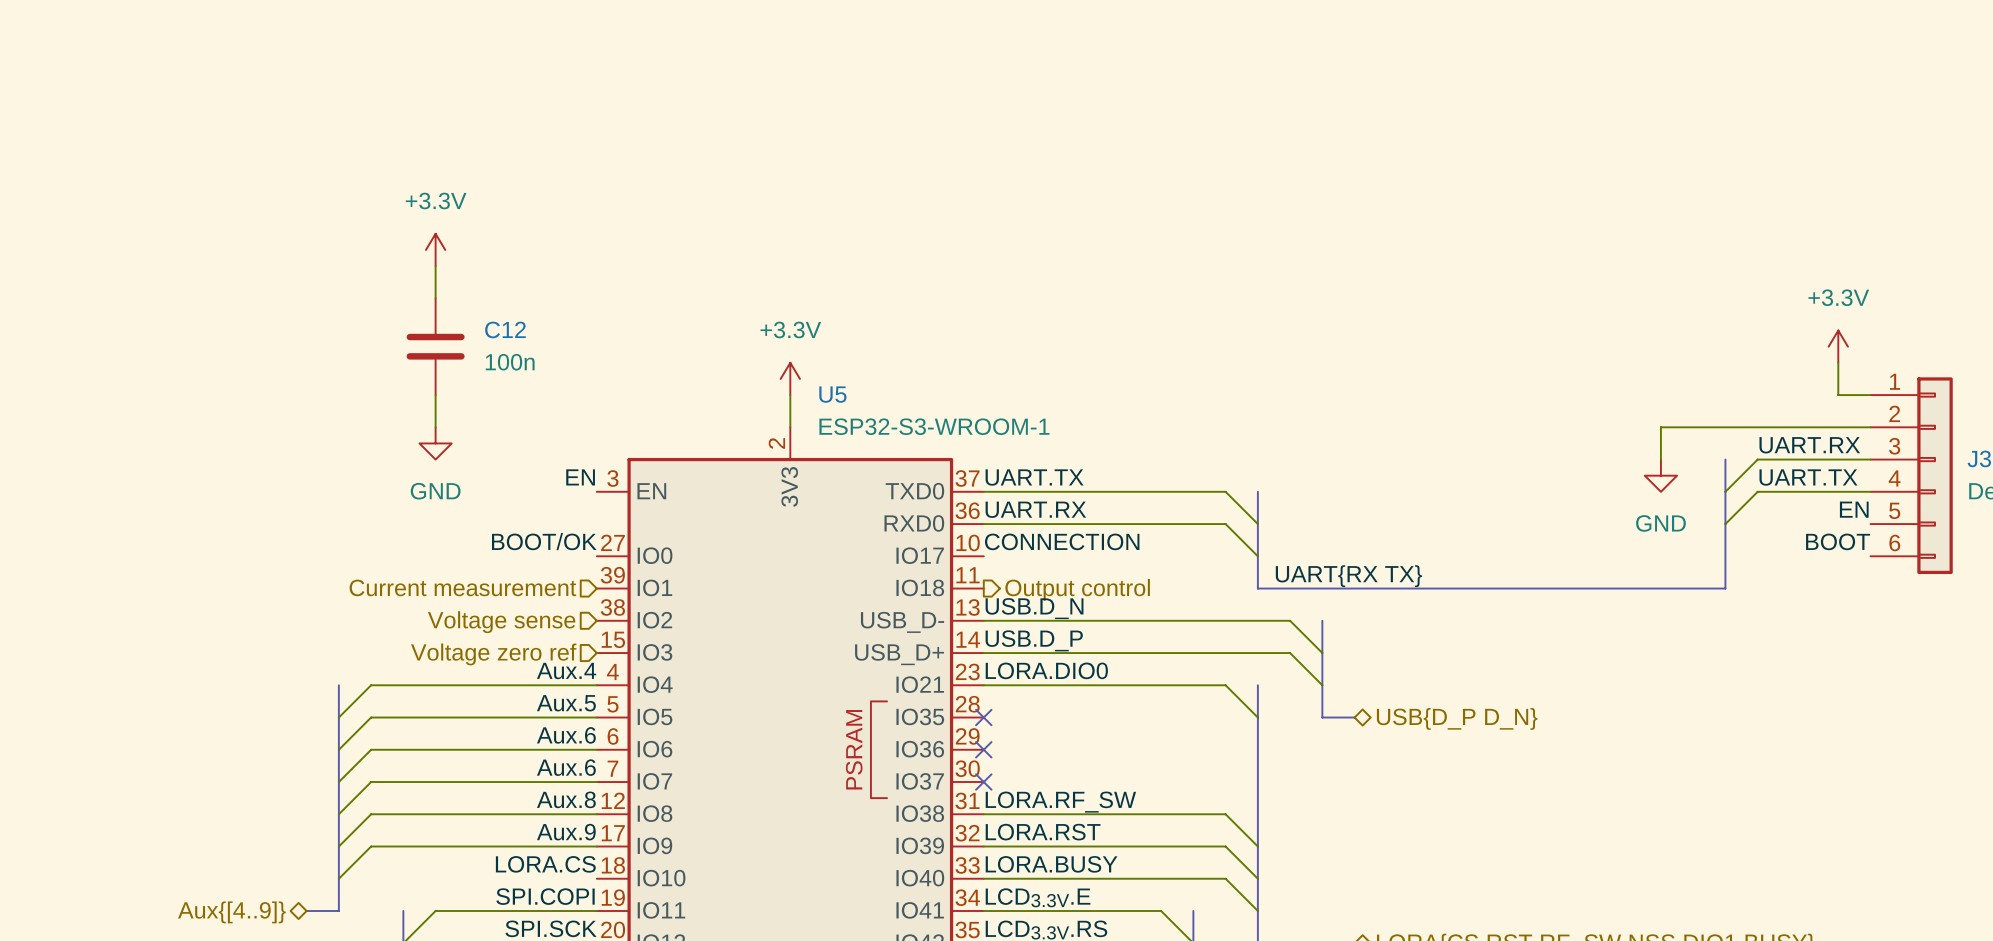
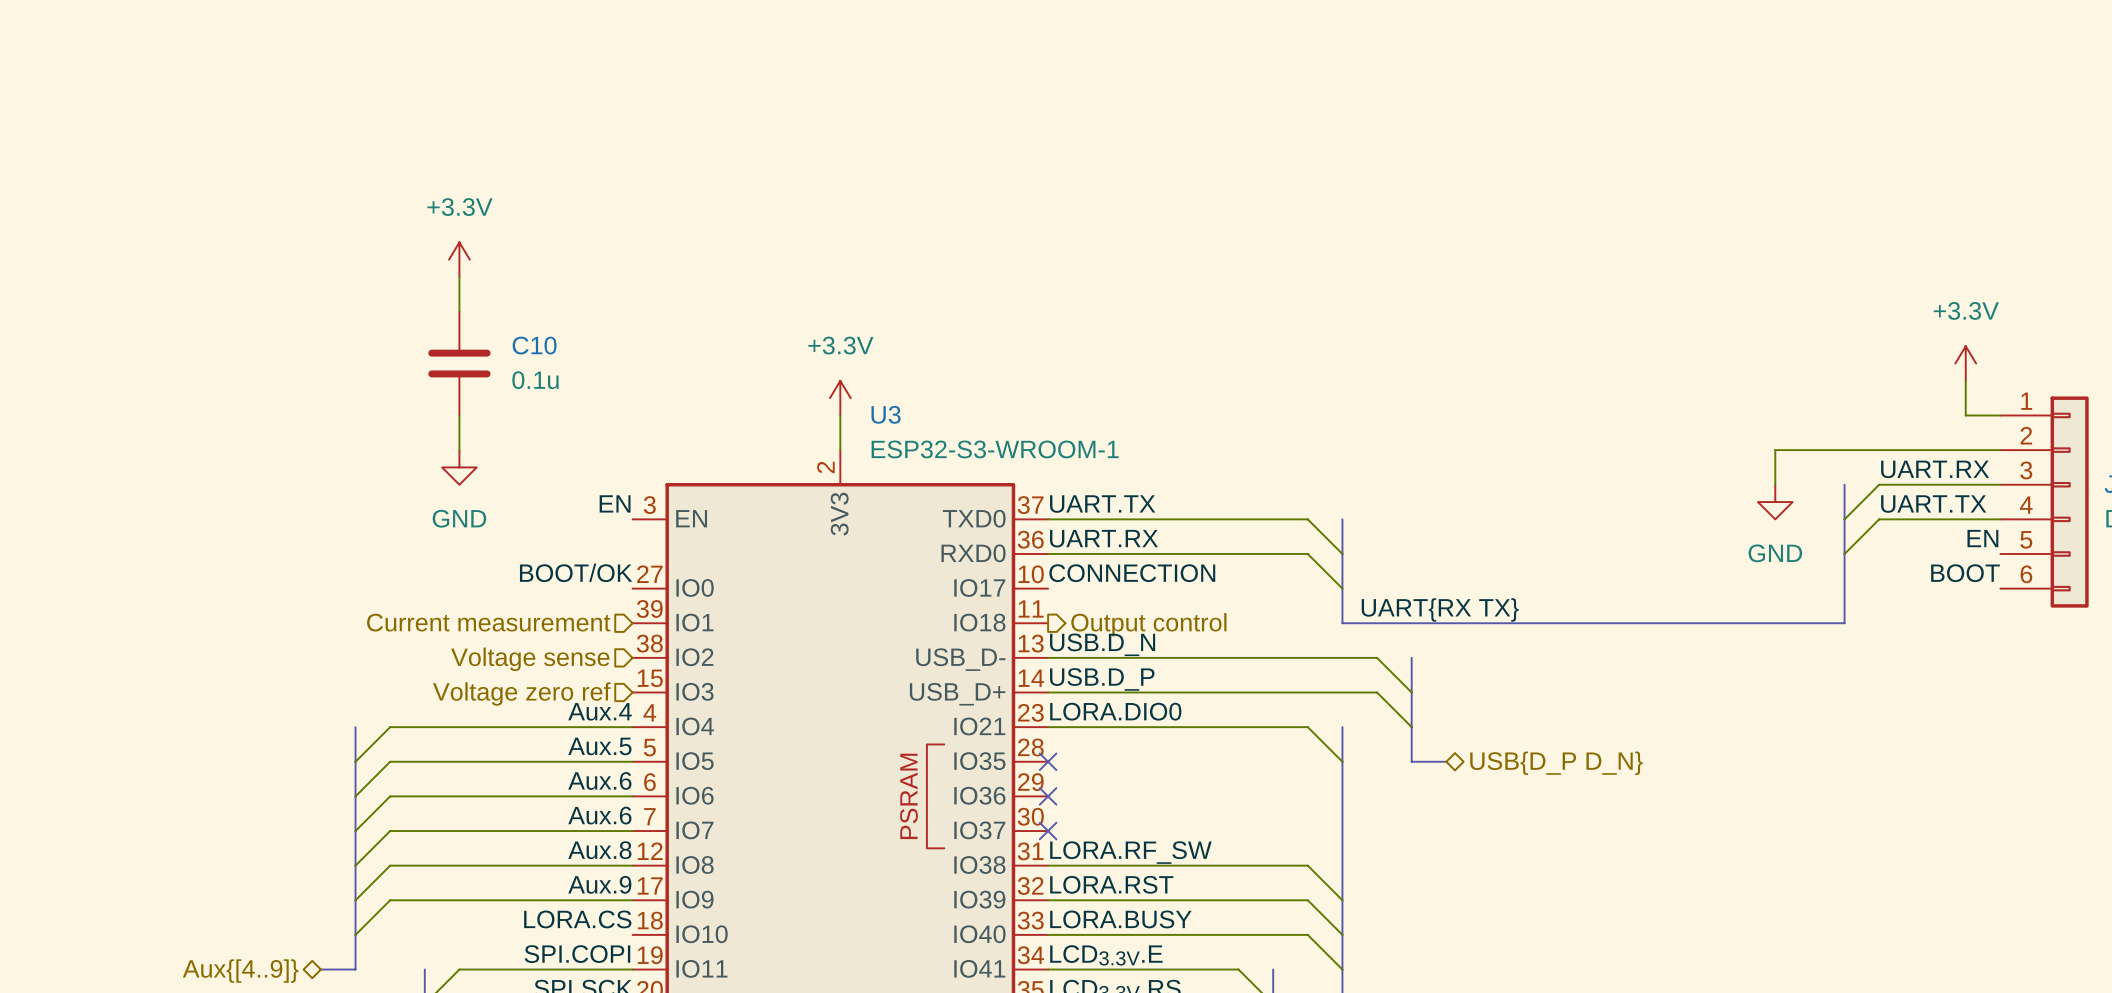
C12 name: C12 (505, 329) -> C10 (534, 345)
C12 value: 100n (510, 362) -> 0.1u (535, 380)
U5 name: U5 (832, 394) -> U3 (886, 414)

